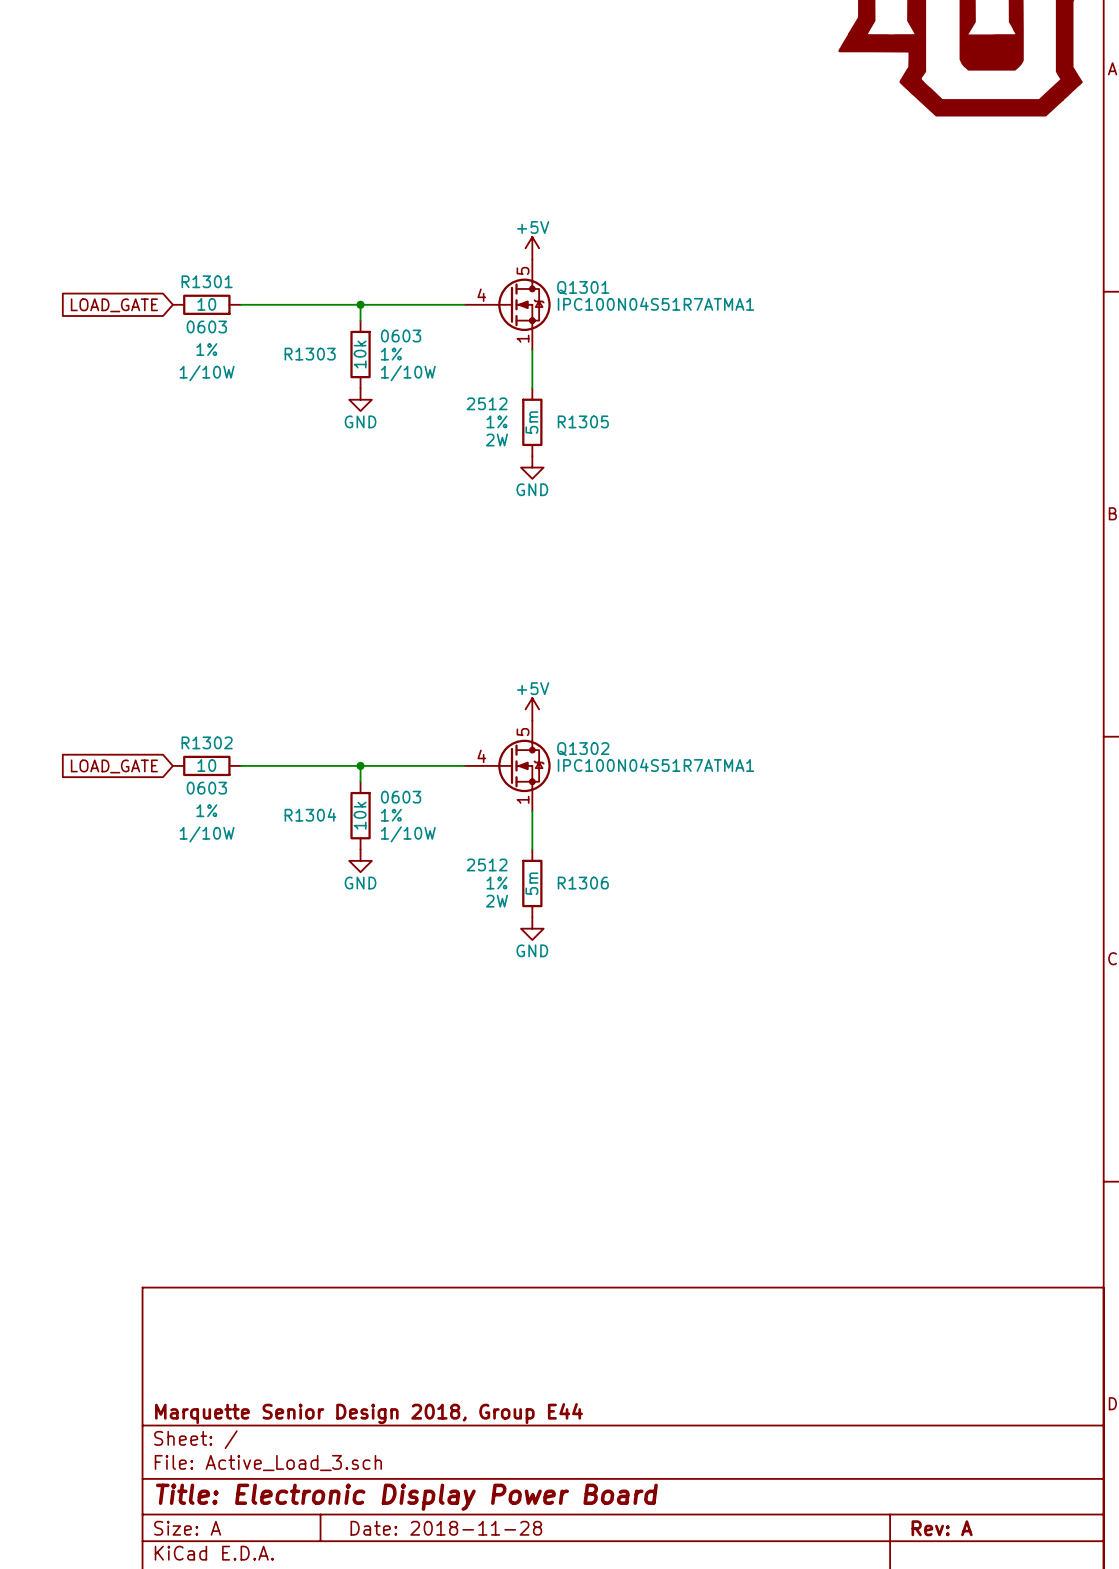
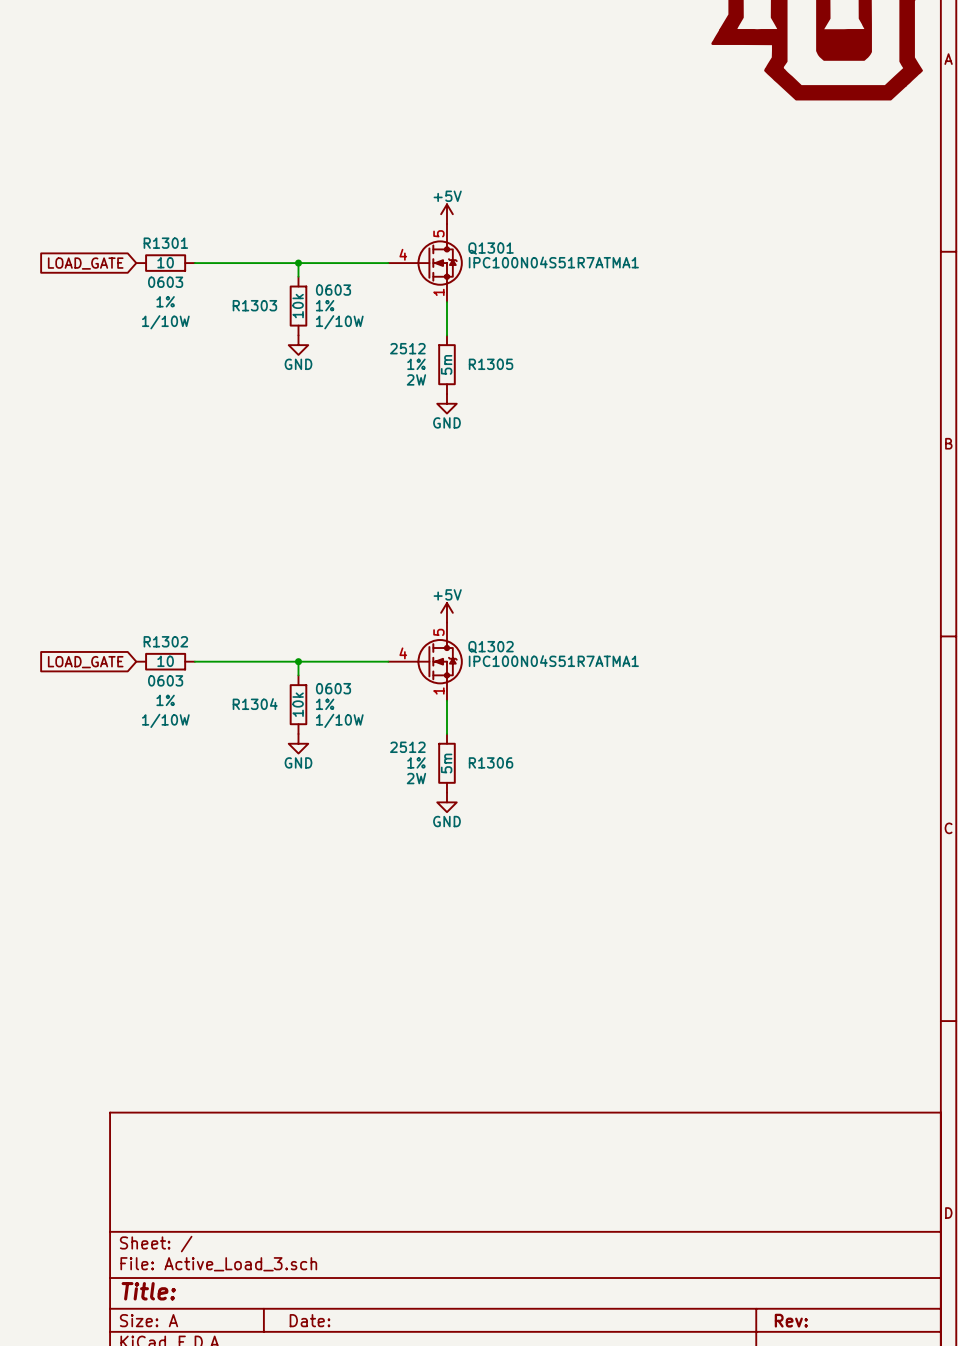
title block: Marquette Senior Design 2018, Group E44 (369, 1413) -> none
title block: Title: Electronic Display Power Board (406, 1497) -> Title: (148, 1291)
title block: Date: 2018-11-28 (446, 1528) -> Date: (310, 1320)
title block: Rev: A (942, 1528) -> Rev: (791, 1320)

